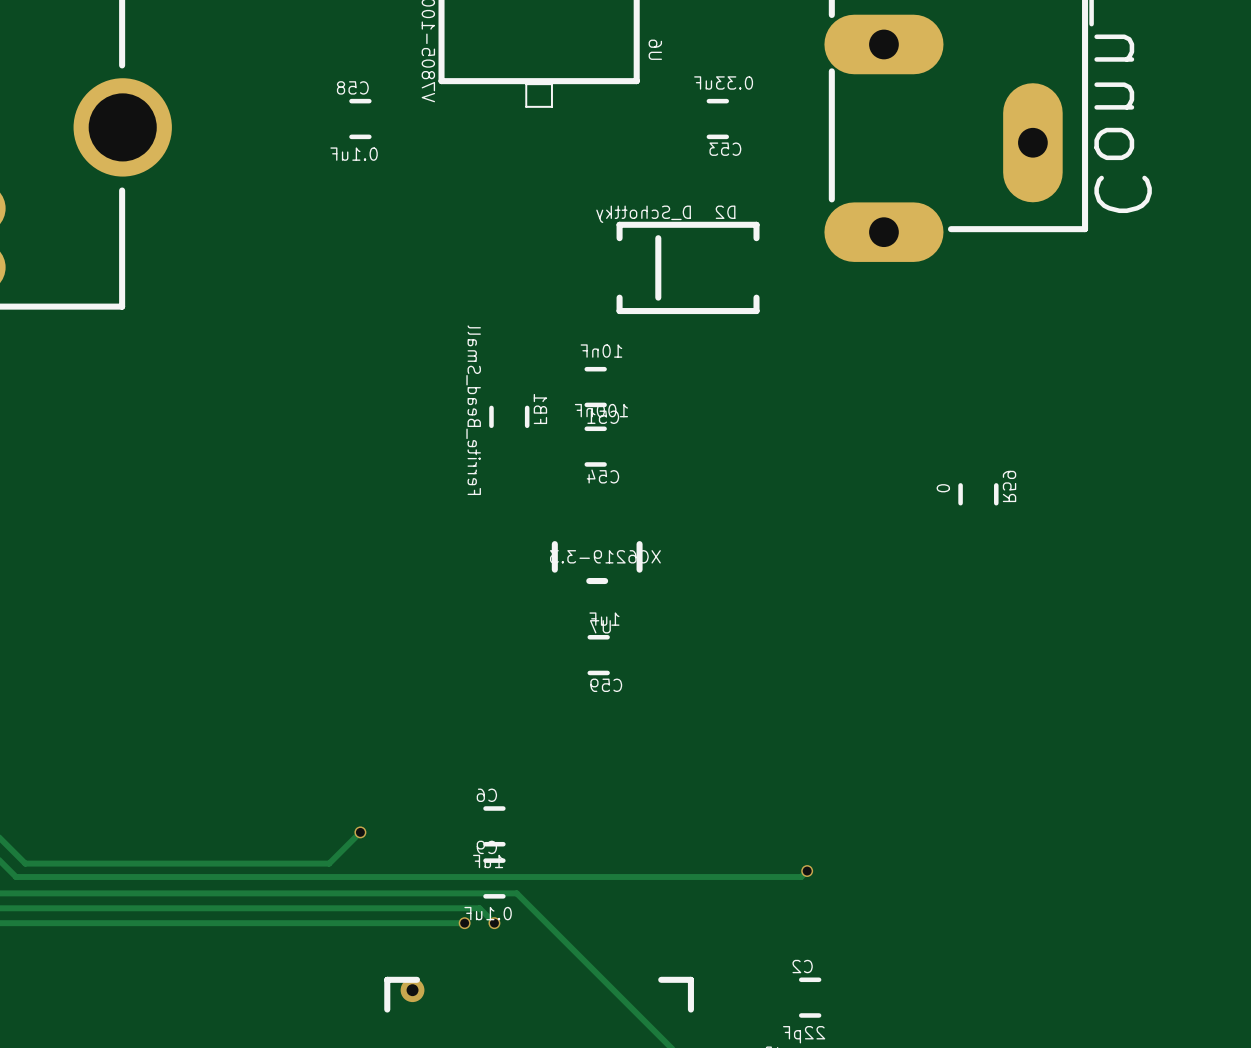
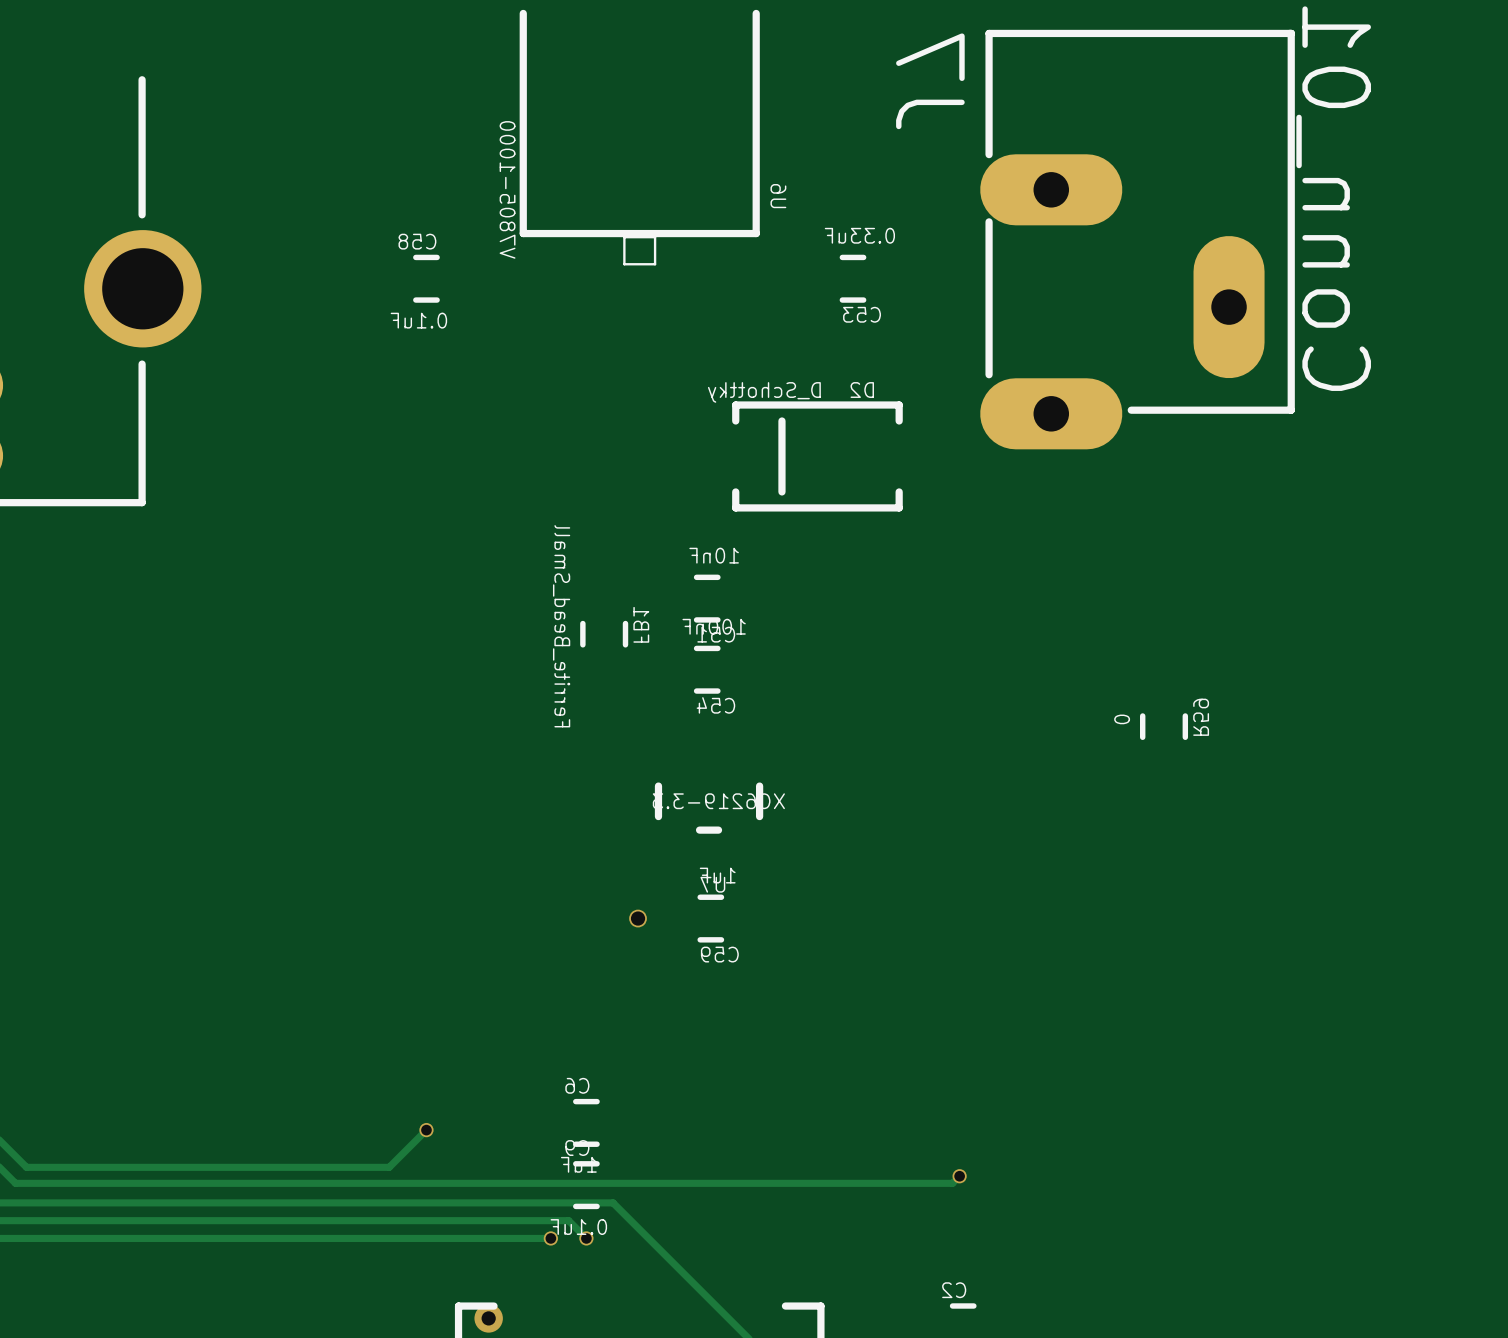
via: none -> (638, 918)

